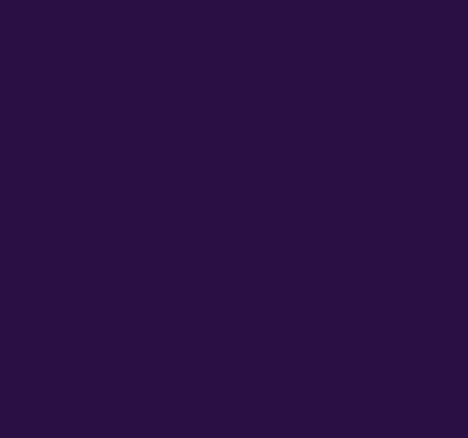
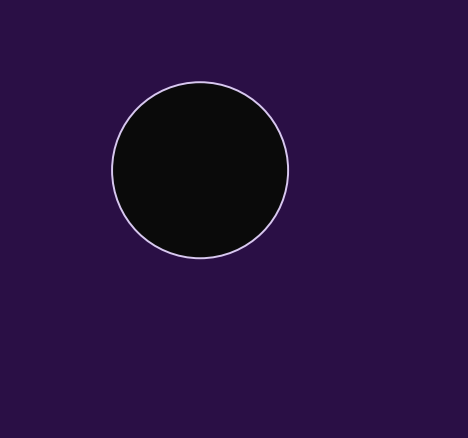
part: none -> (200, 170)

